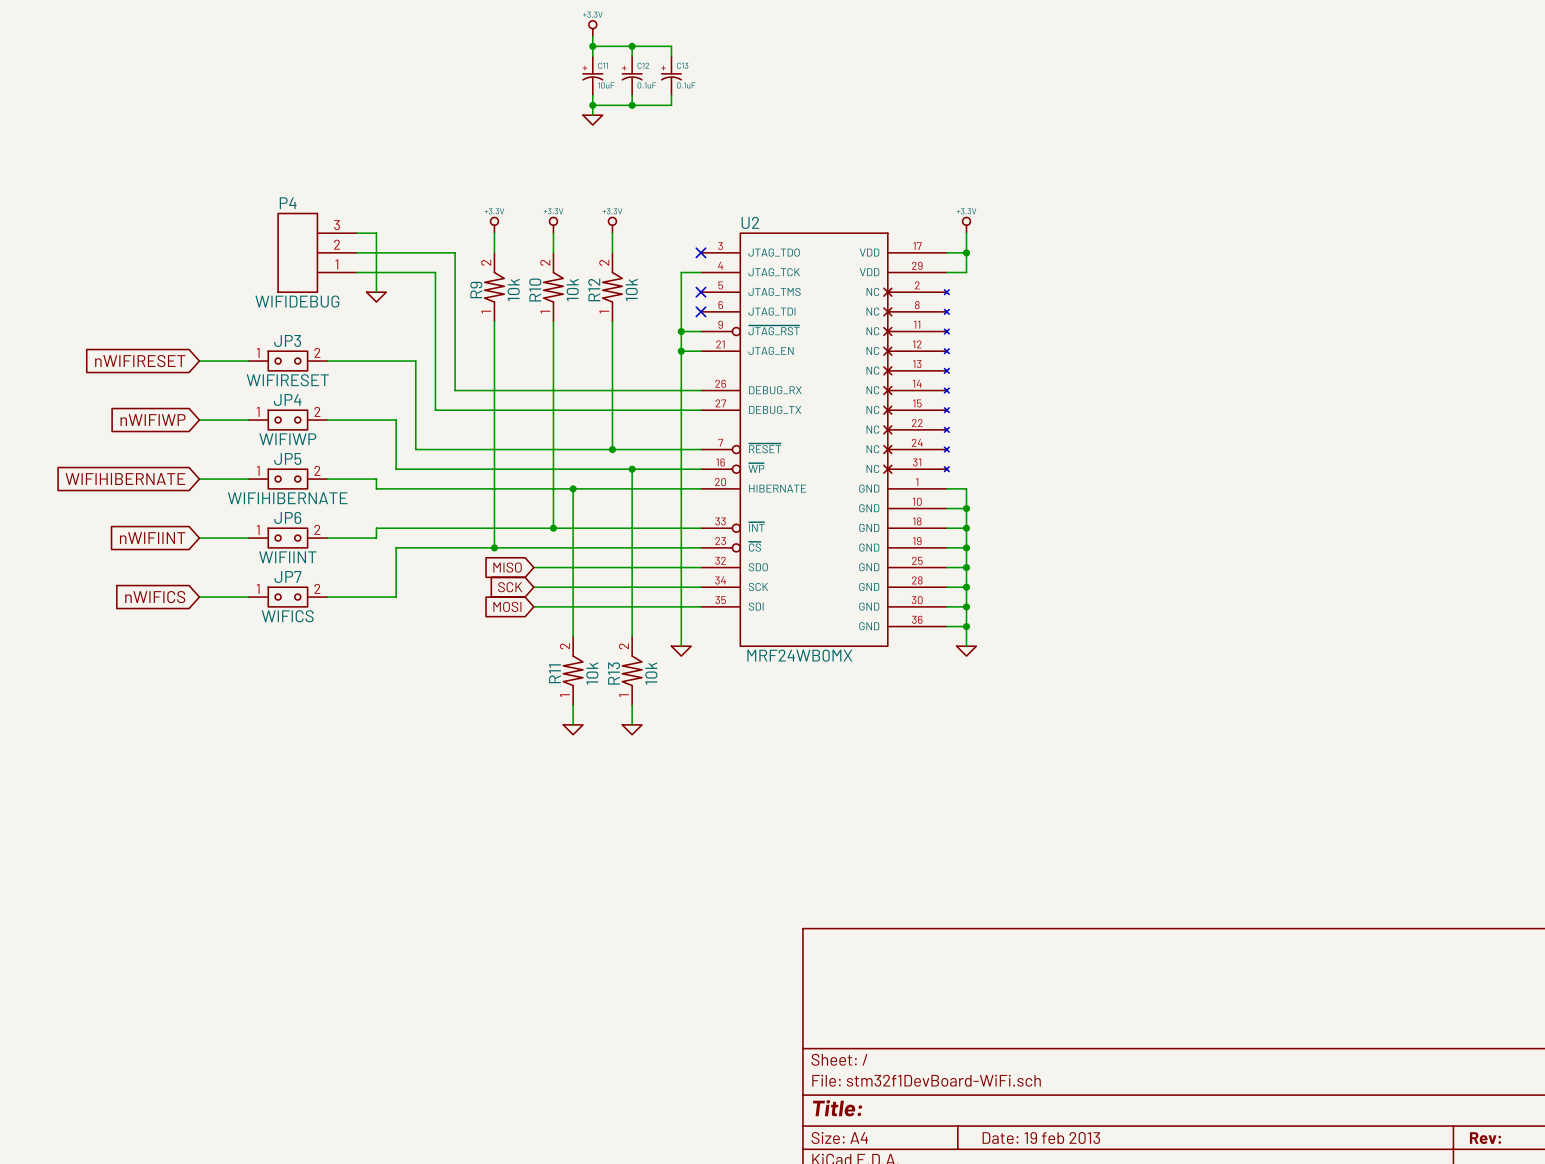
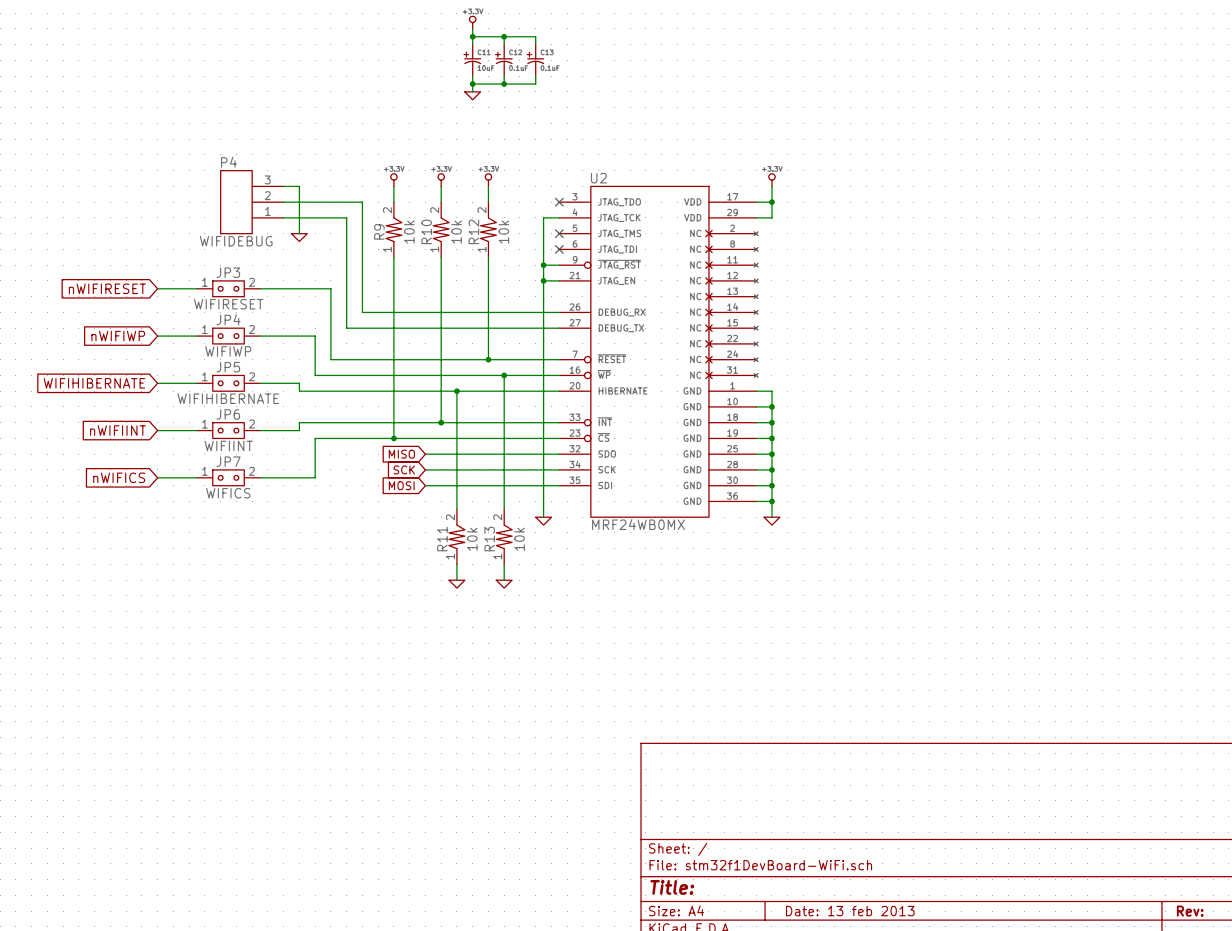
title block: Date: 19 feb 2013 (1041, 1138) -> Date: 13 feb 2013 (850, 911)

